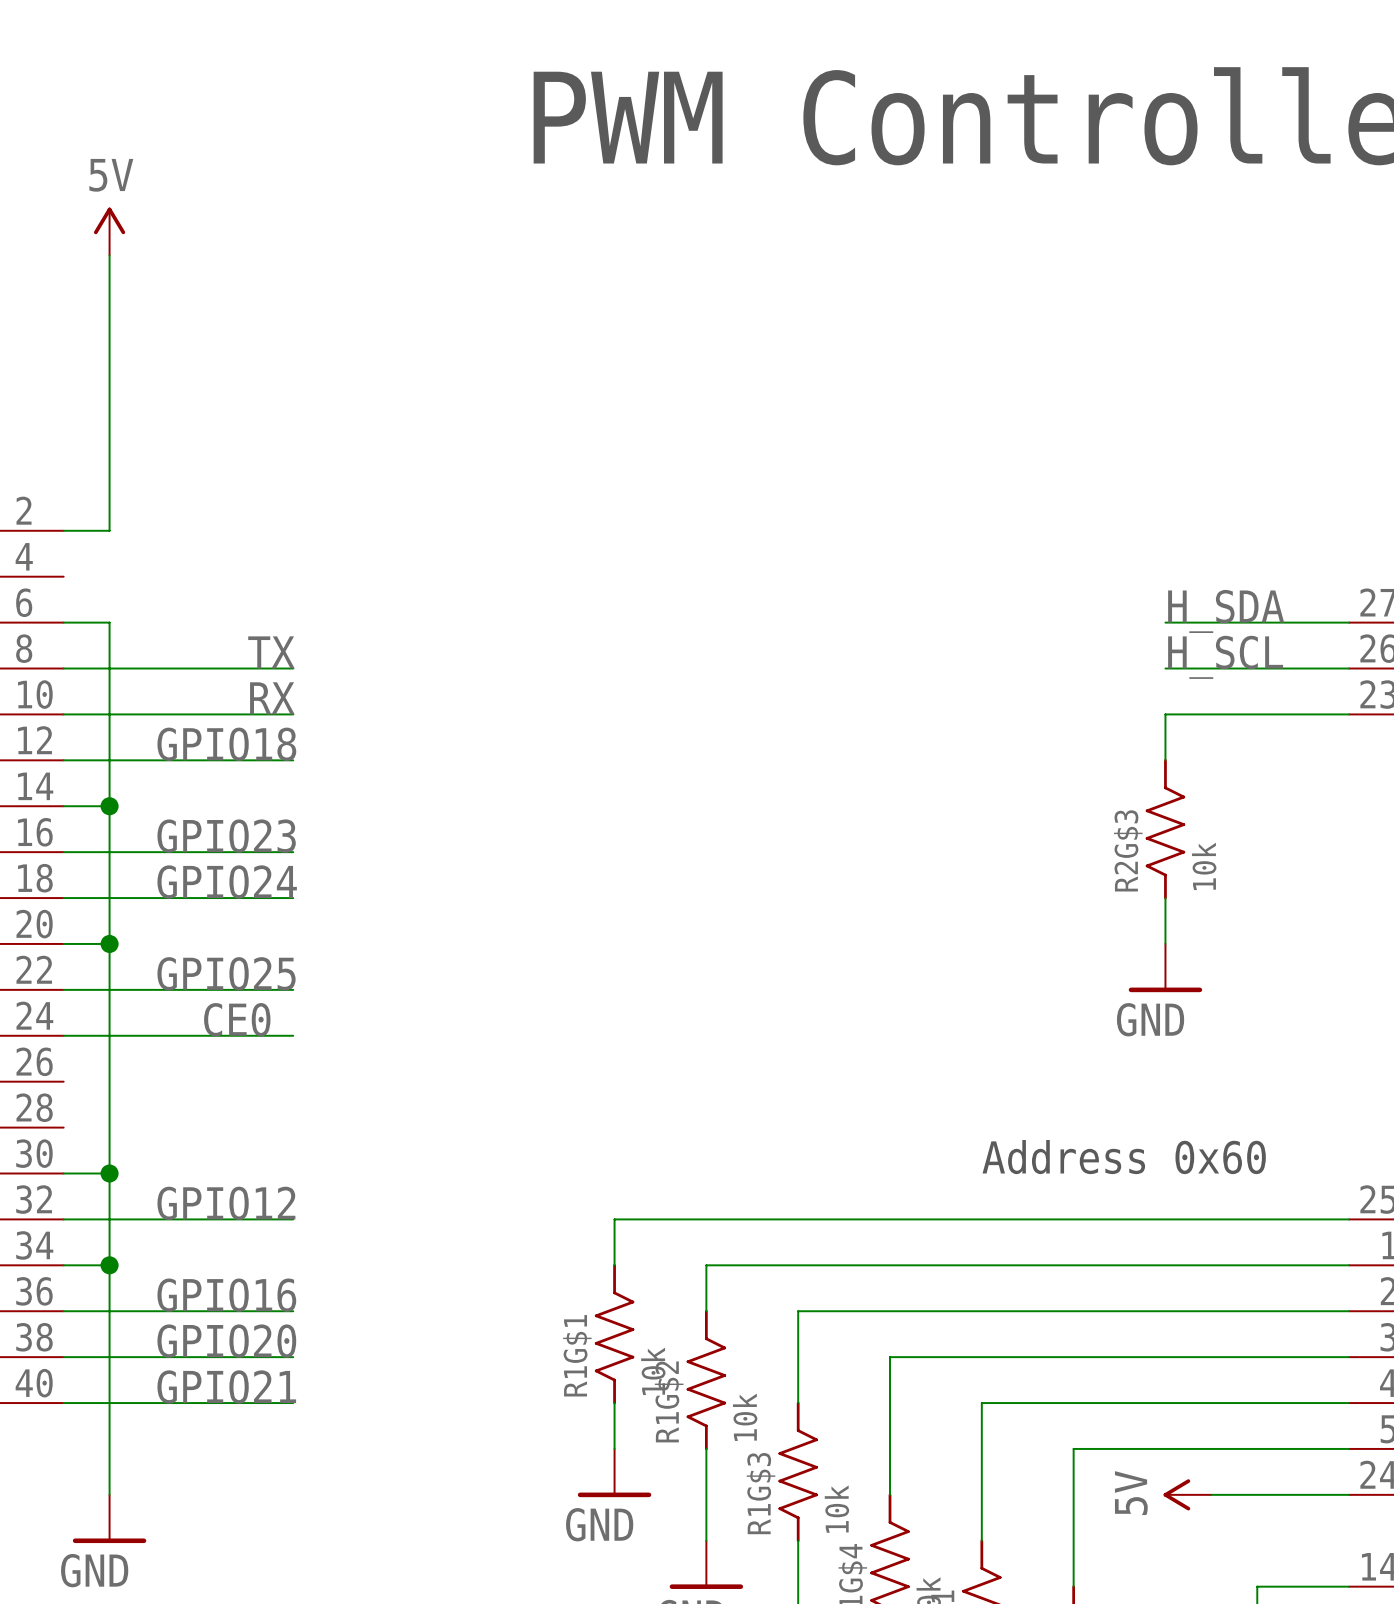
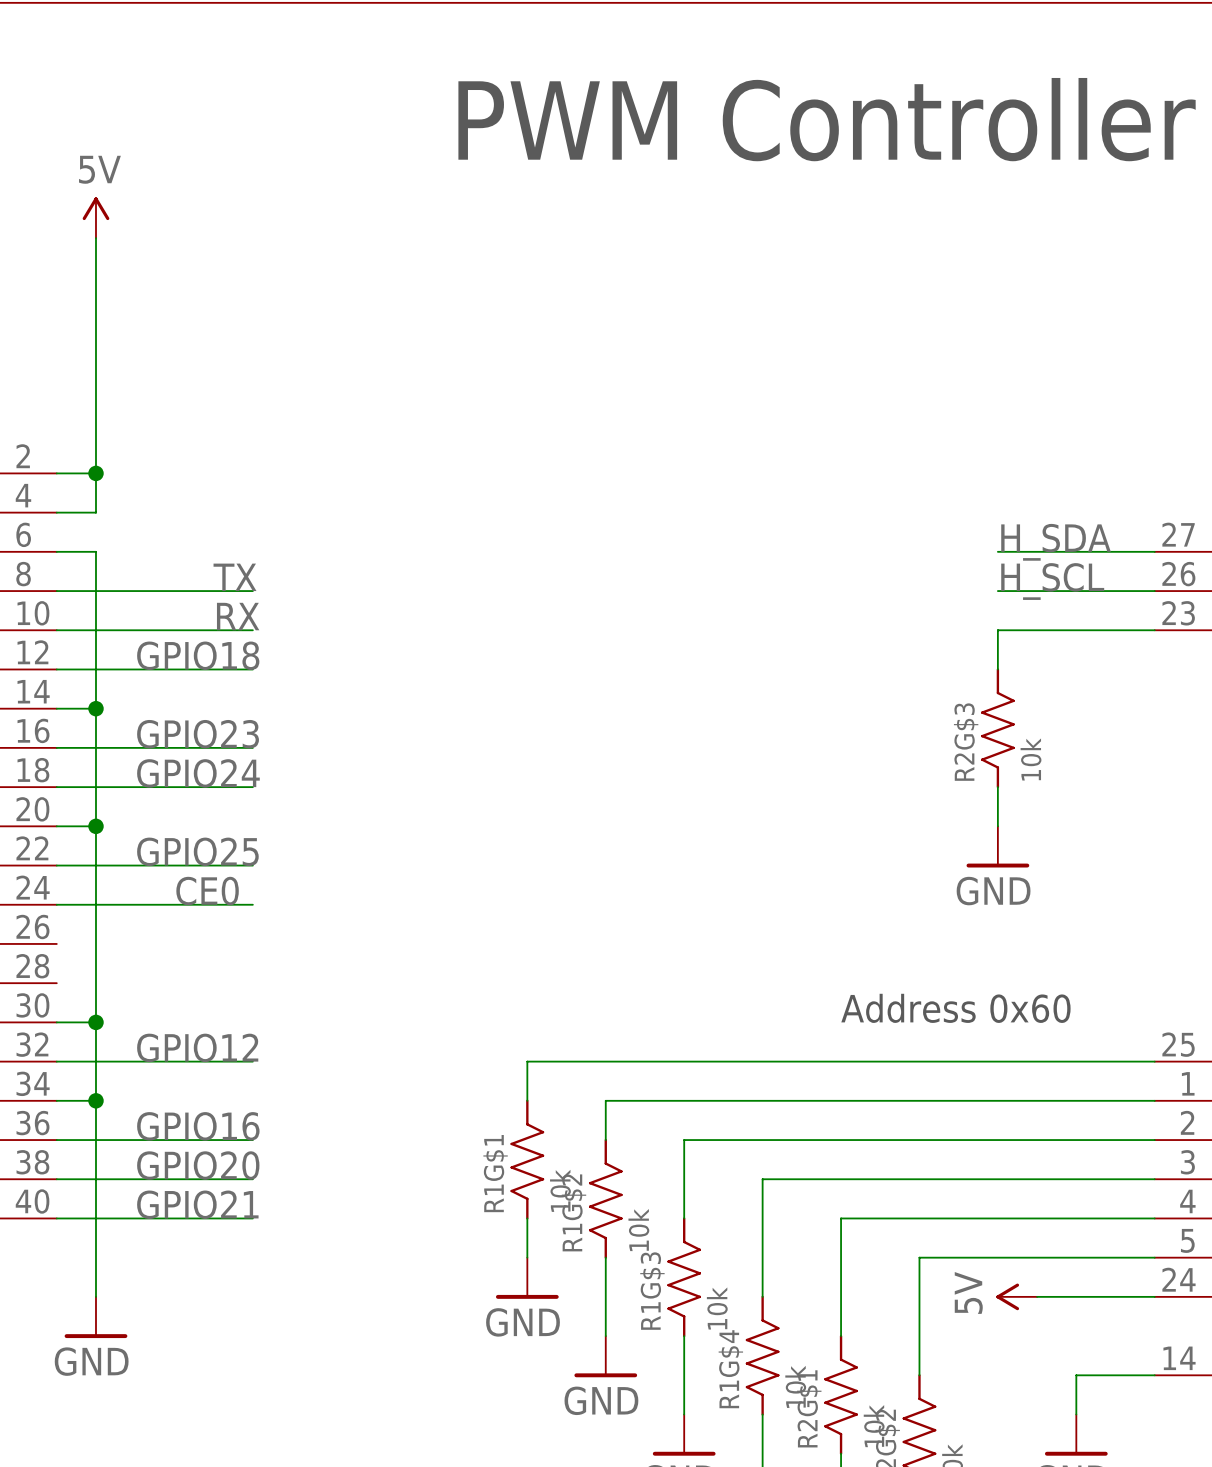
wire: none -> (95, 473) (95, 512) (56, 512)
junction: none -> (95, 473)

